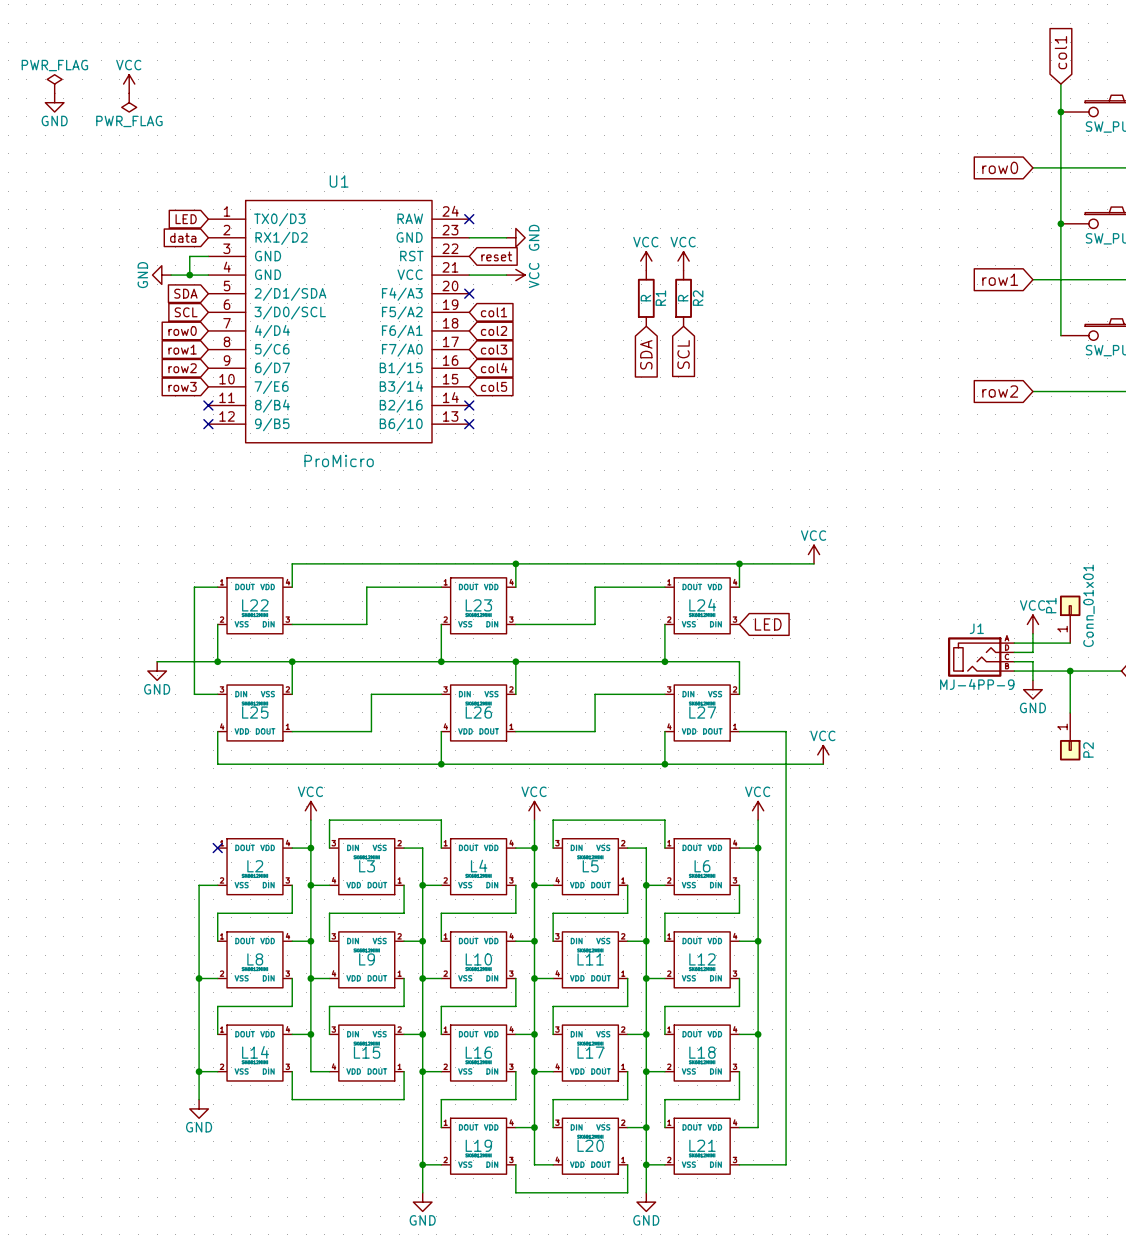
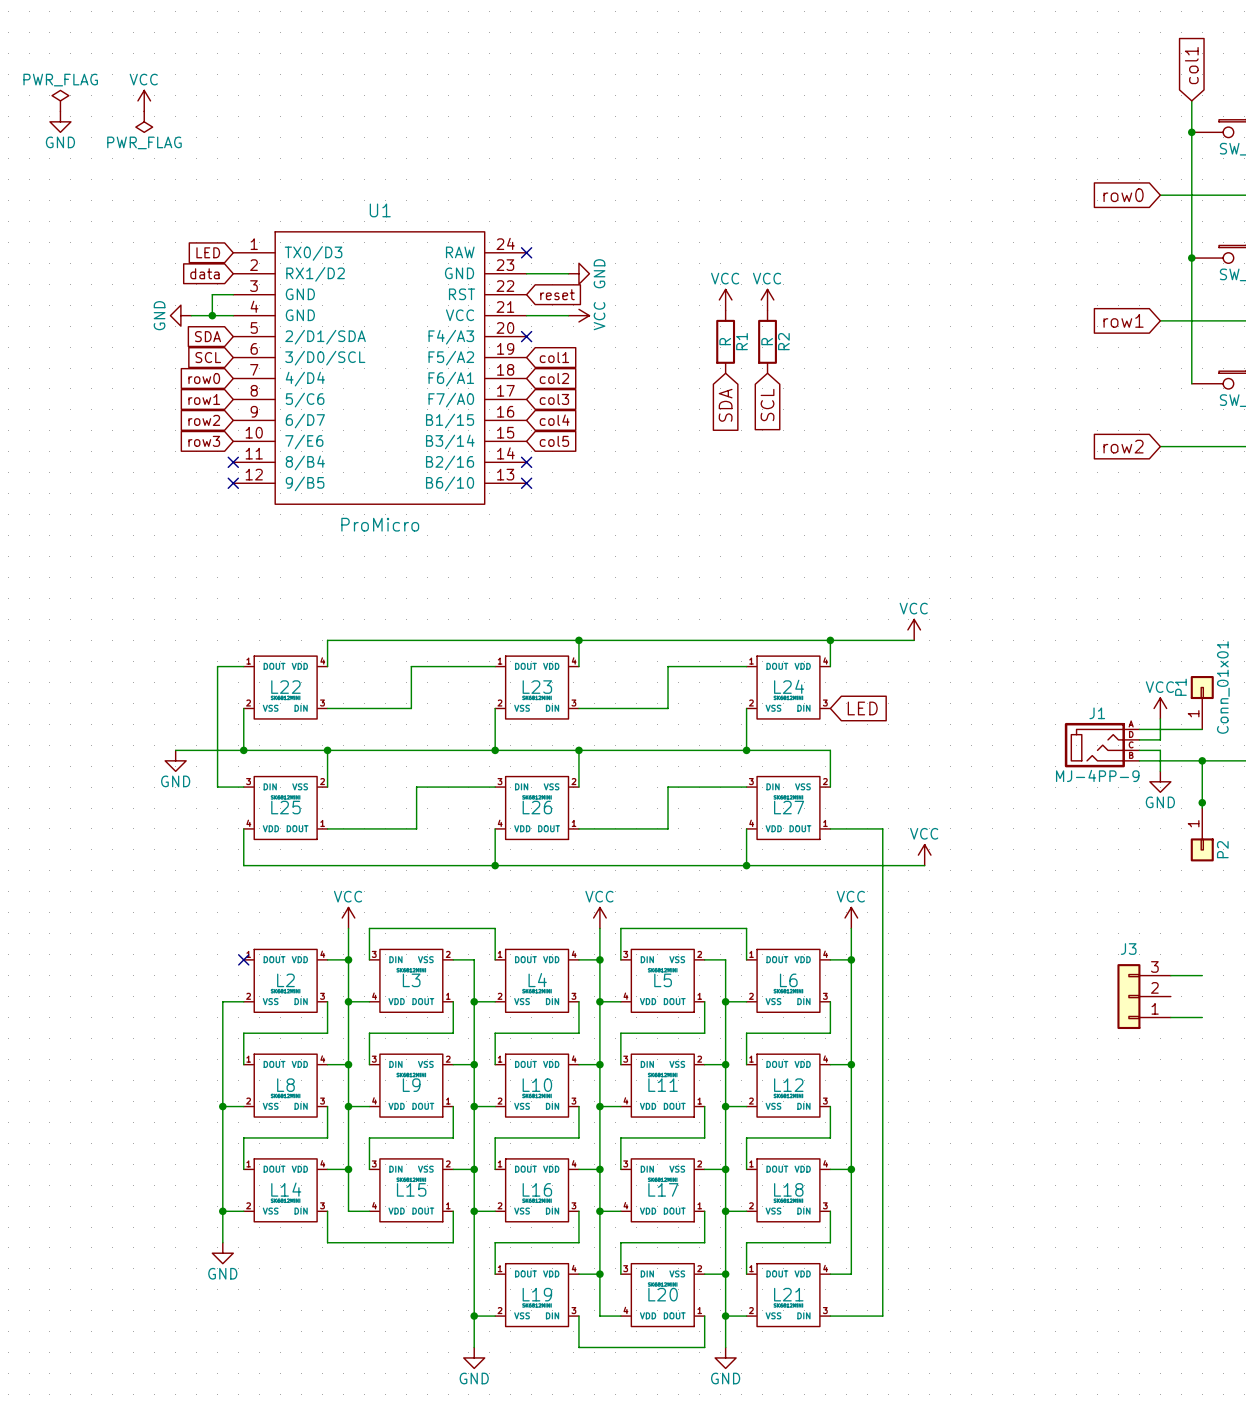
junction: none -> (1202, 802)
wire: none -> (1170, 975) (1202, 975)
J3: none -> (1144, 996)
wire: none -> (1170, 1017) (1202, 1017)

